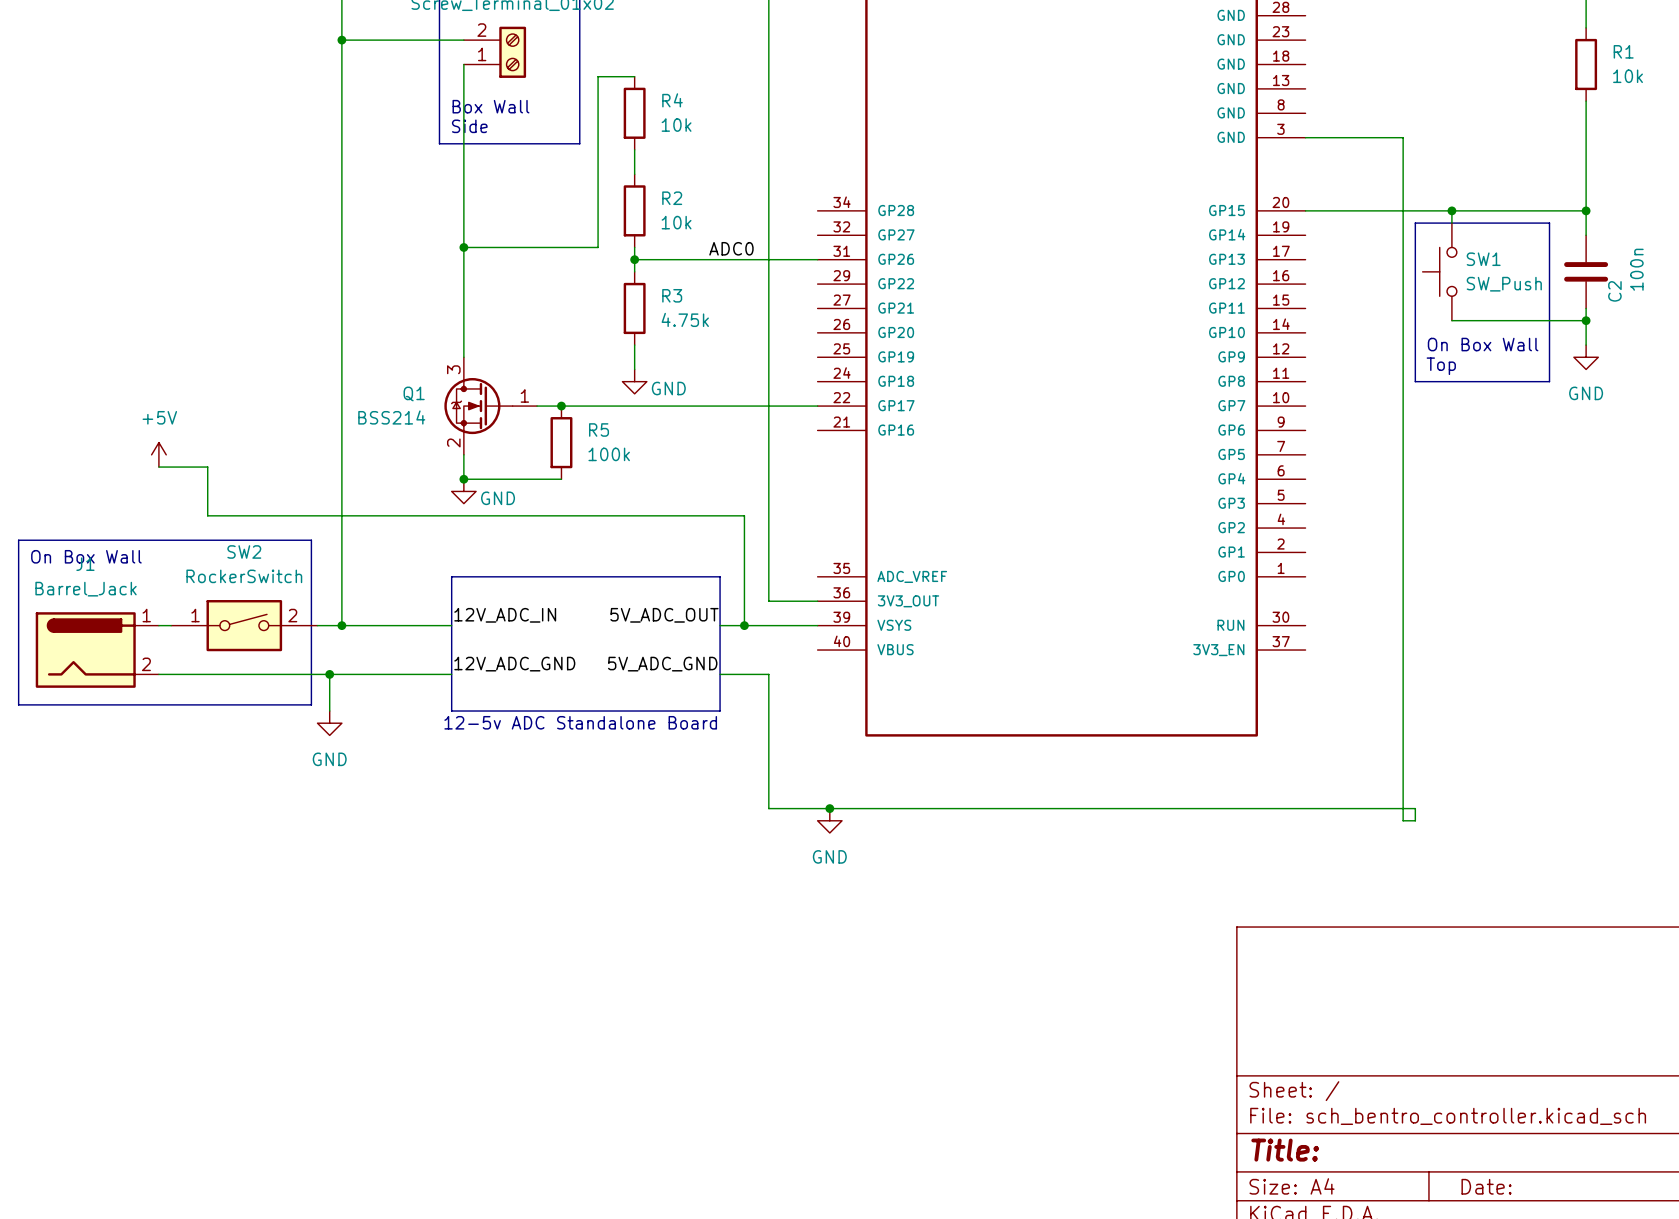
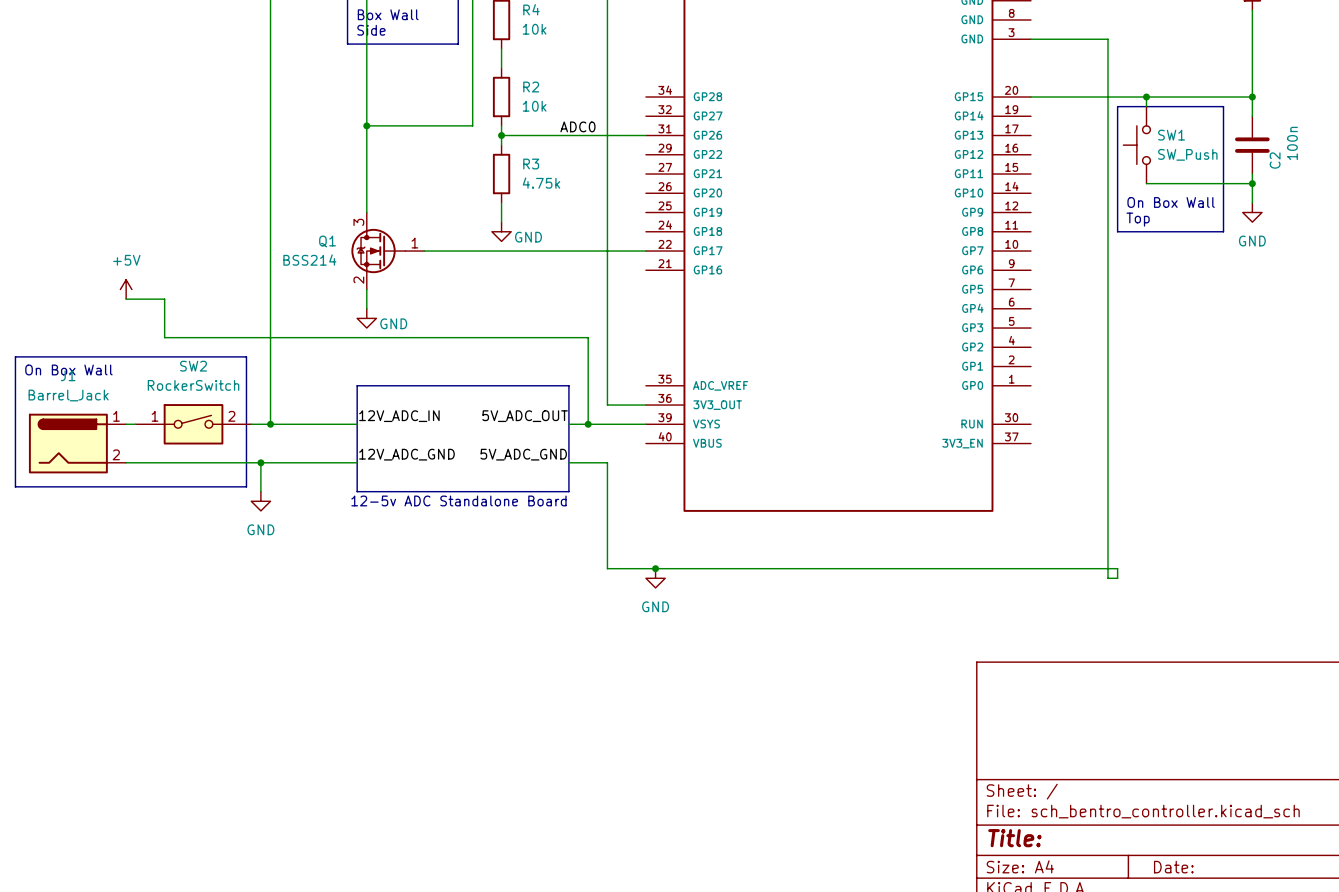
junction: (561, 406) -> none
R5: 100k (561, 442) -> none
wire: (463, 479) (561, 479) -> none
junction: (463, 479) -> none

